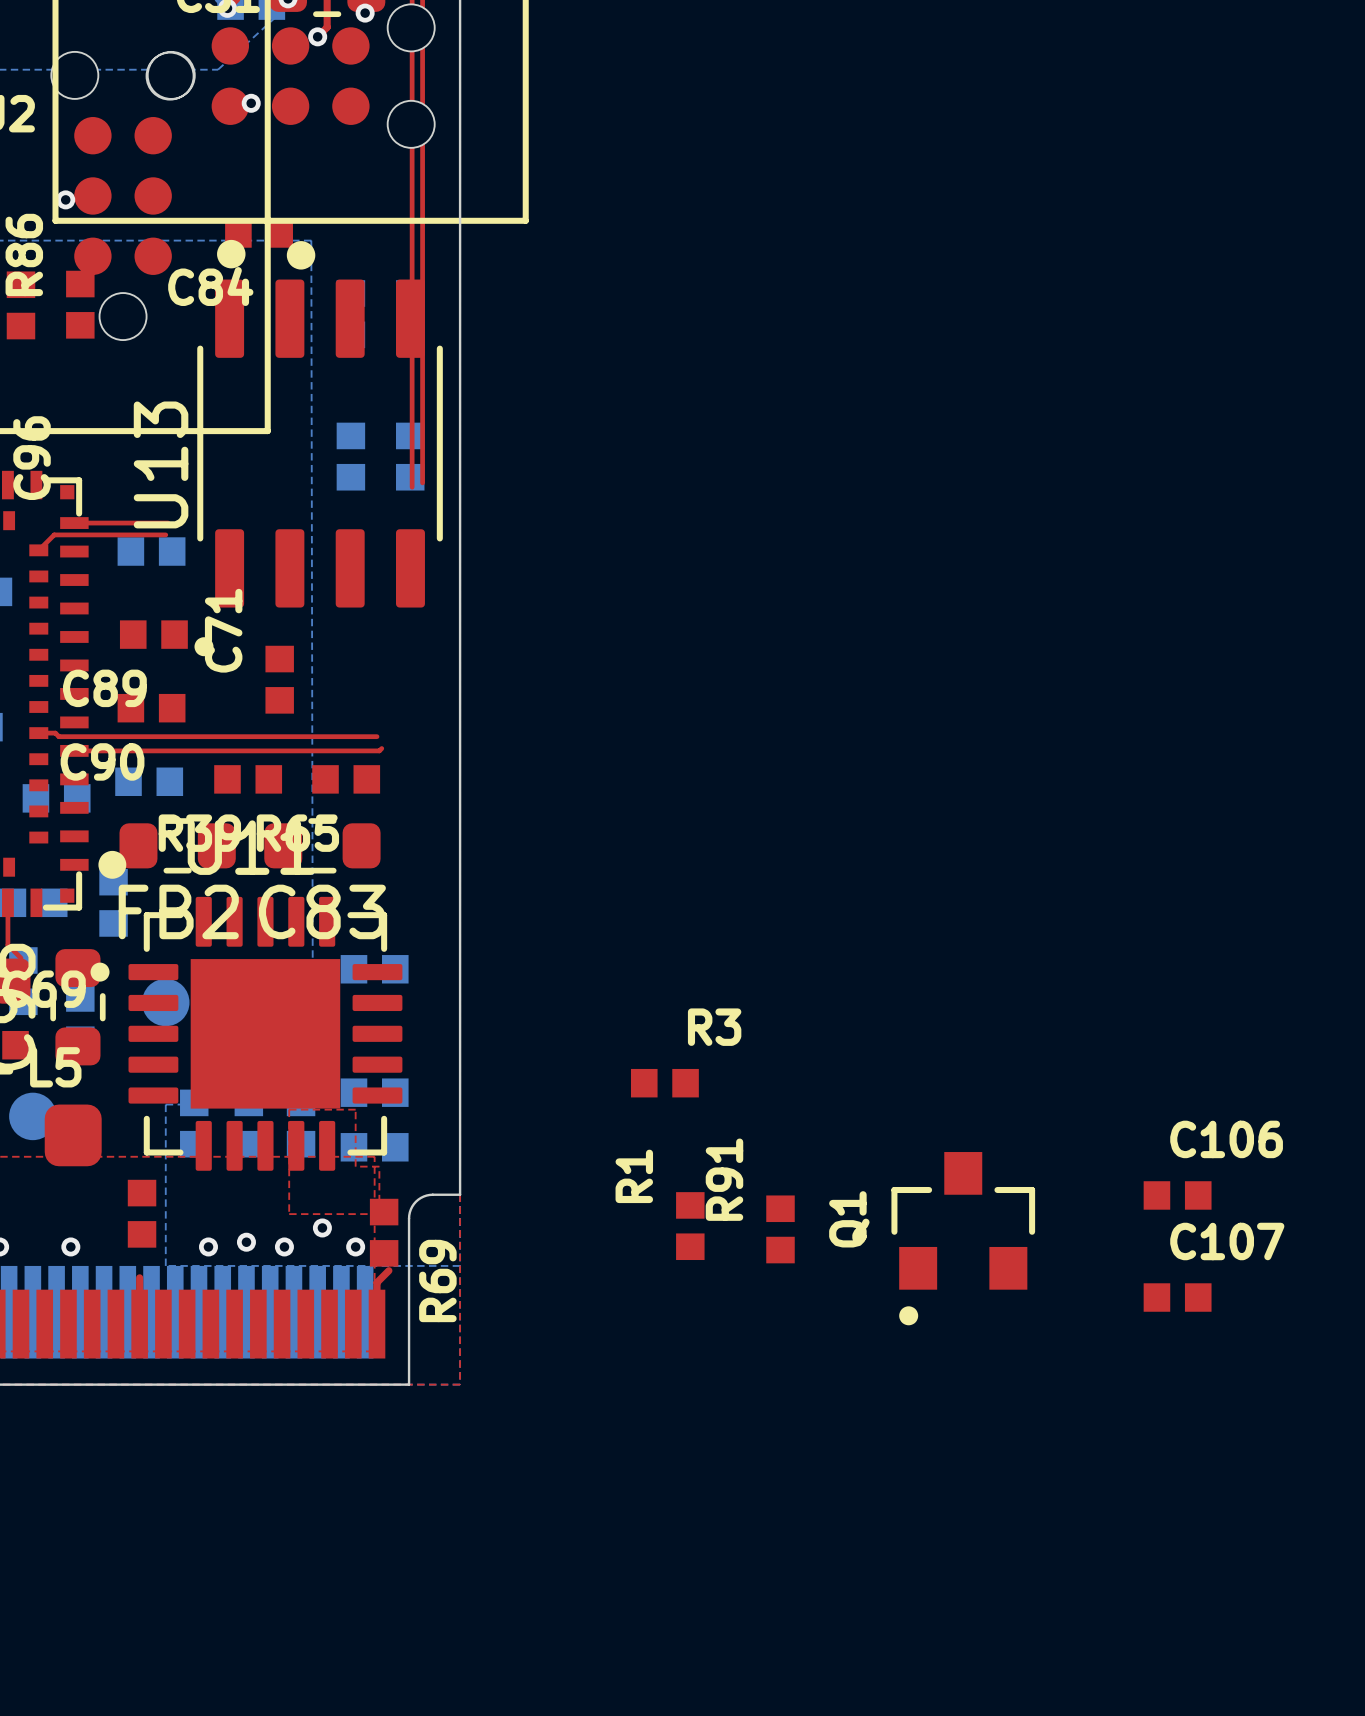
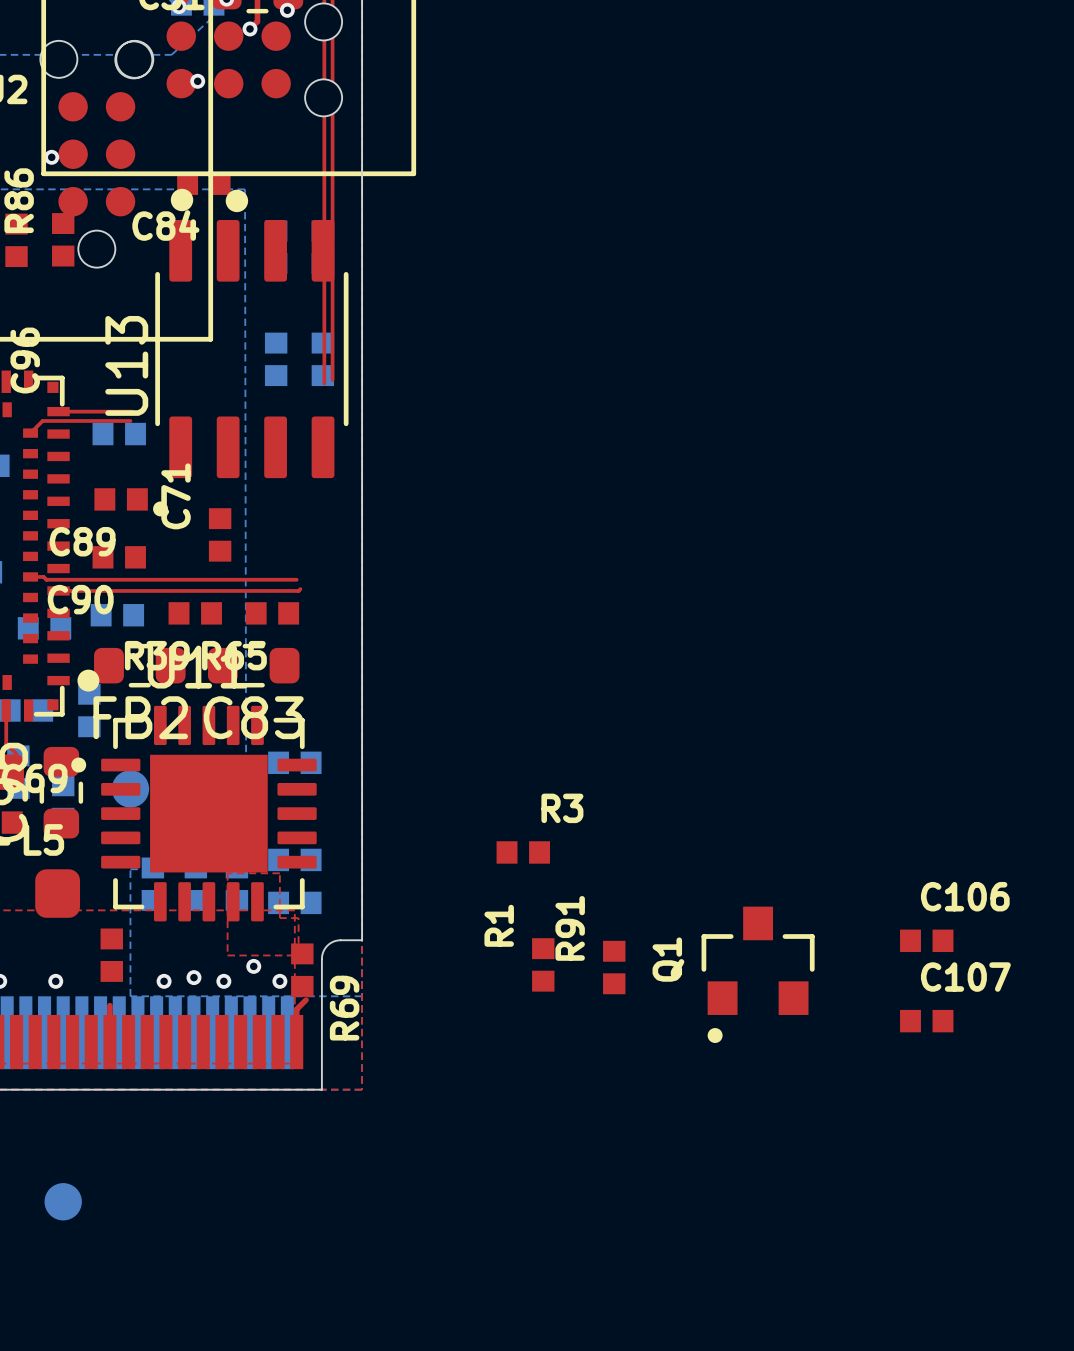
part position: (32, 1116) -> (63, 1201)

